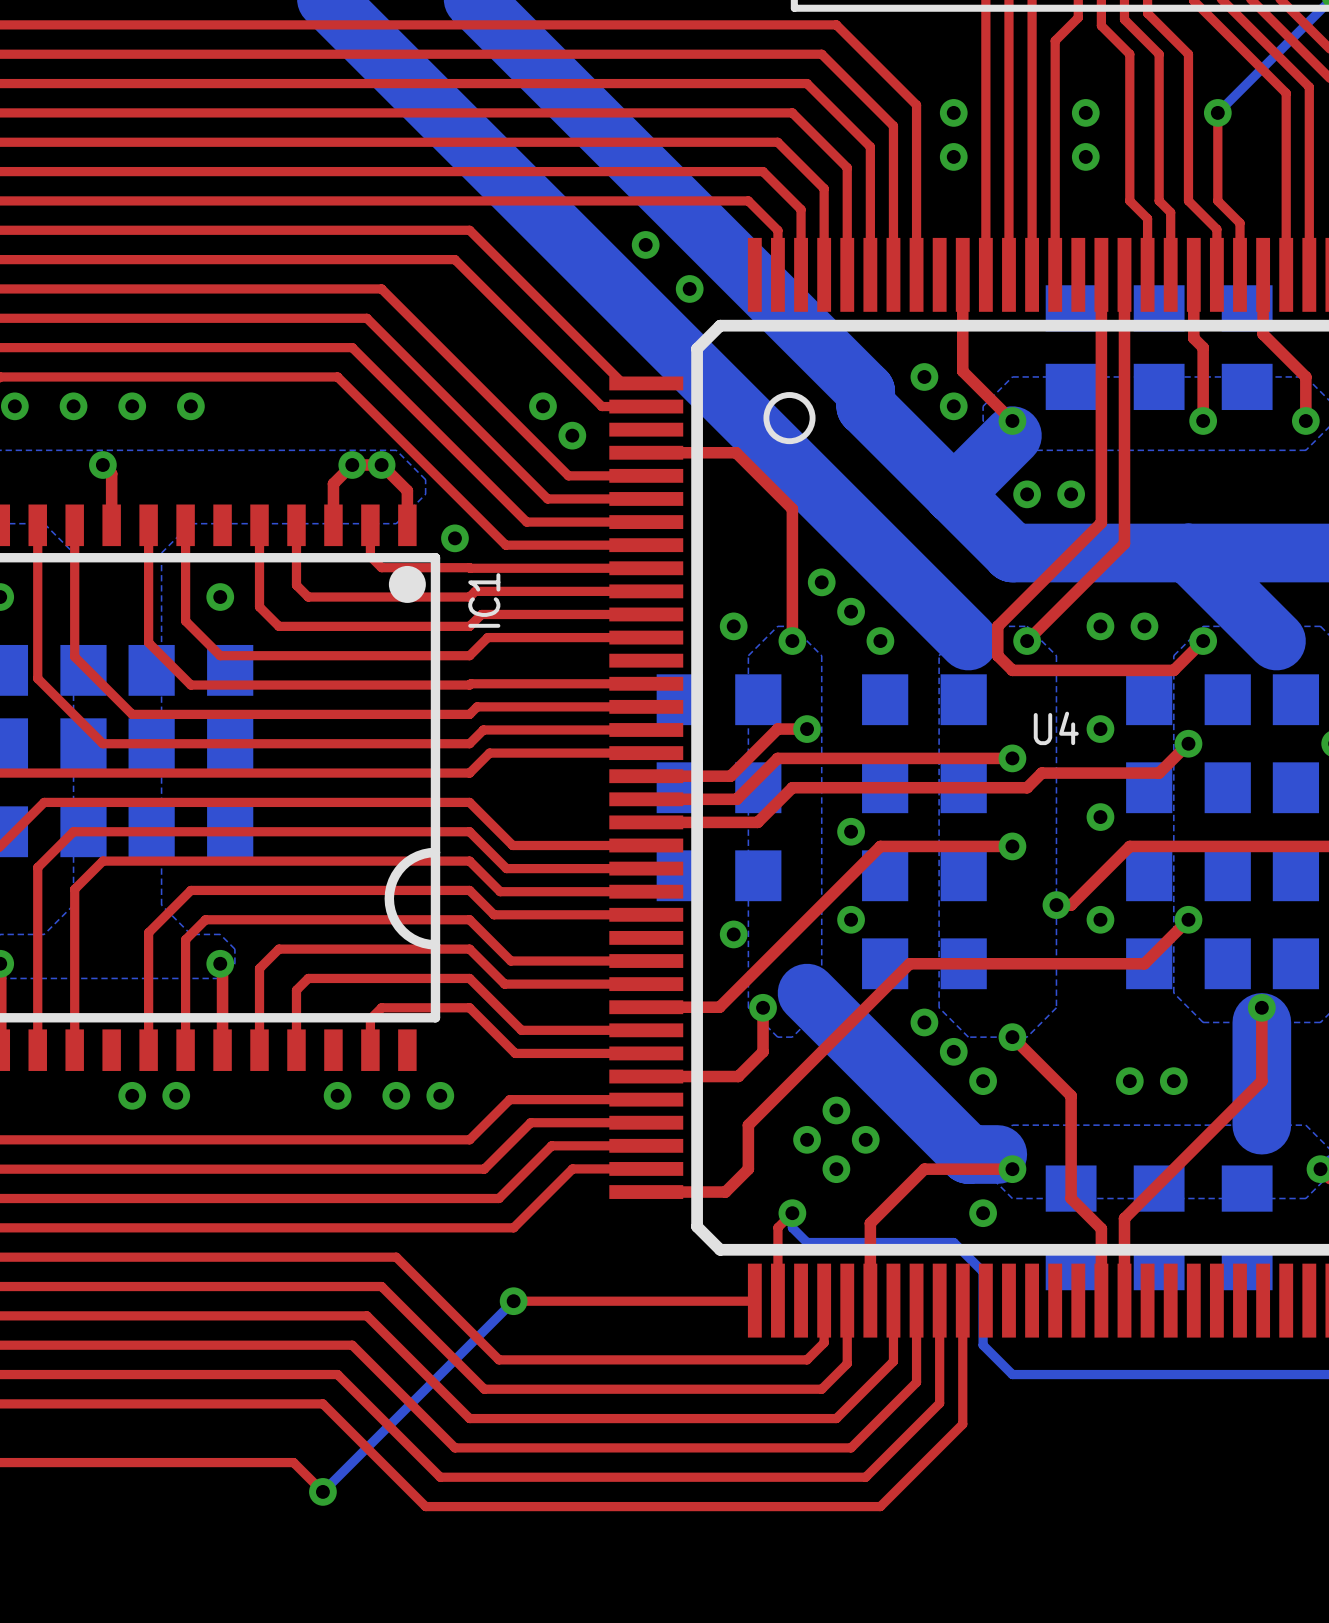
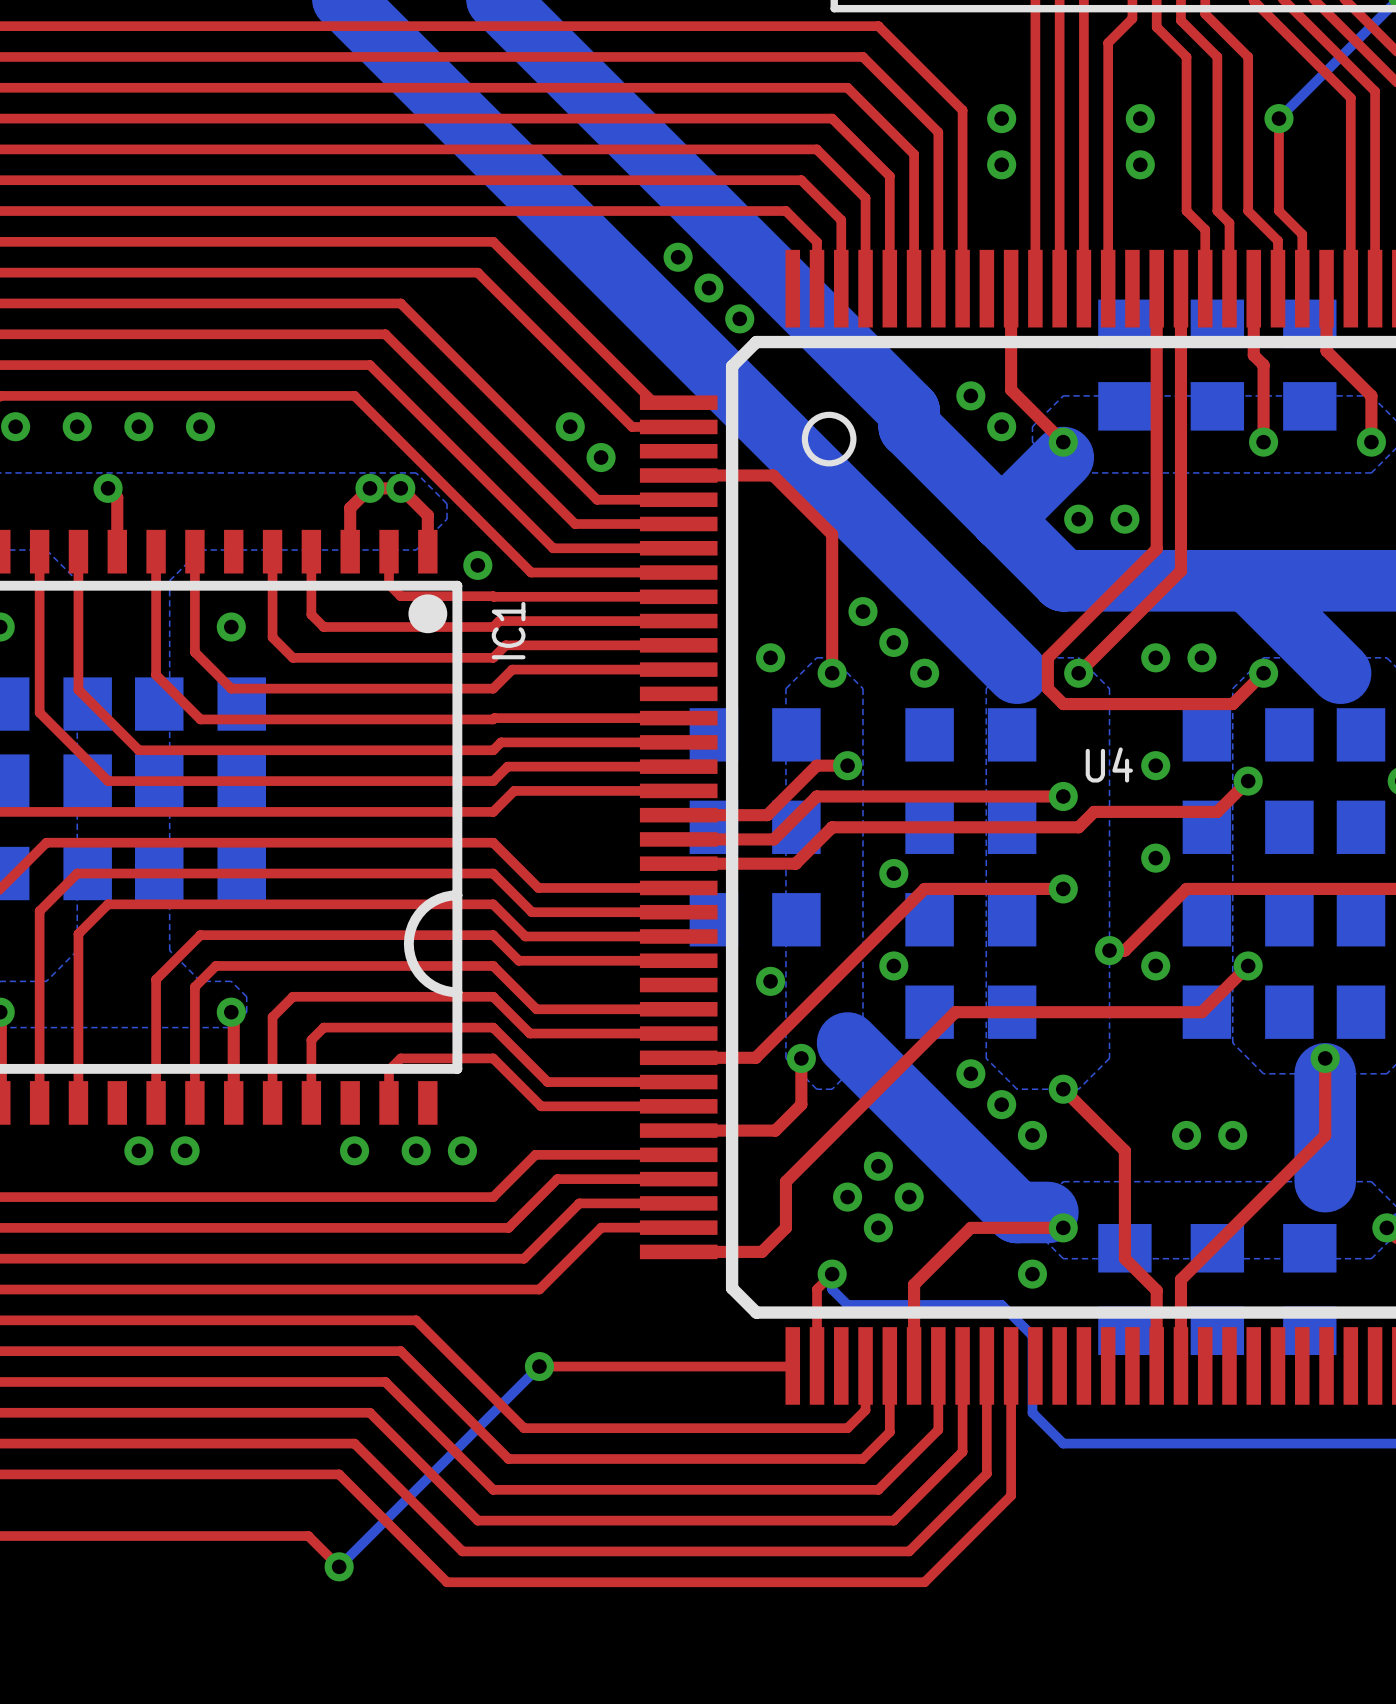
via: none -> (708, 288)
via: (689, 288) -> none
via: none -> (739, 318)

